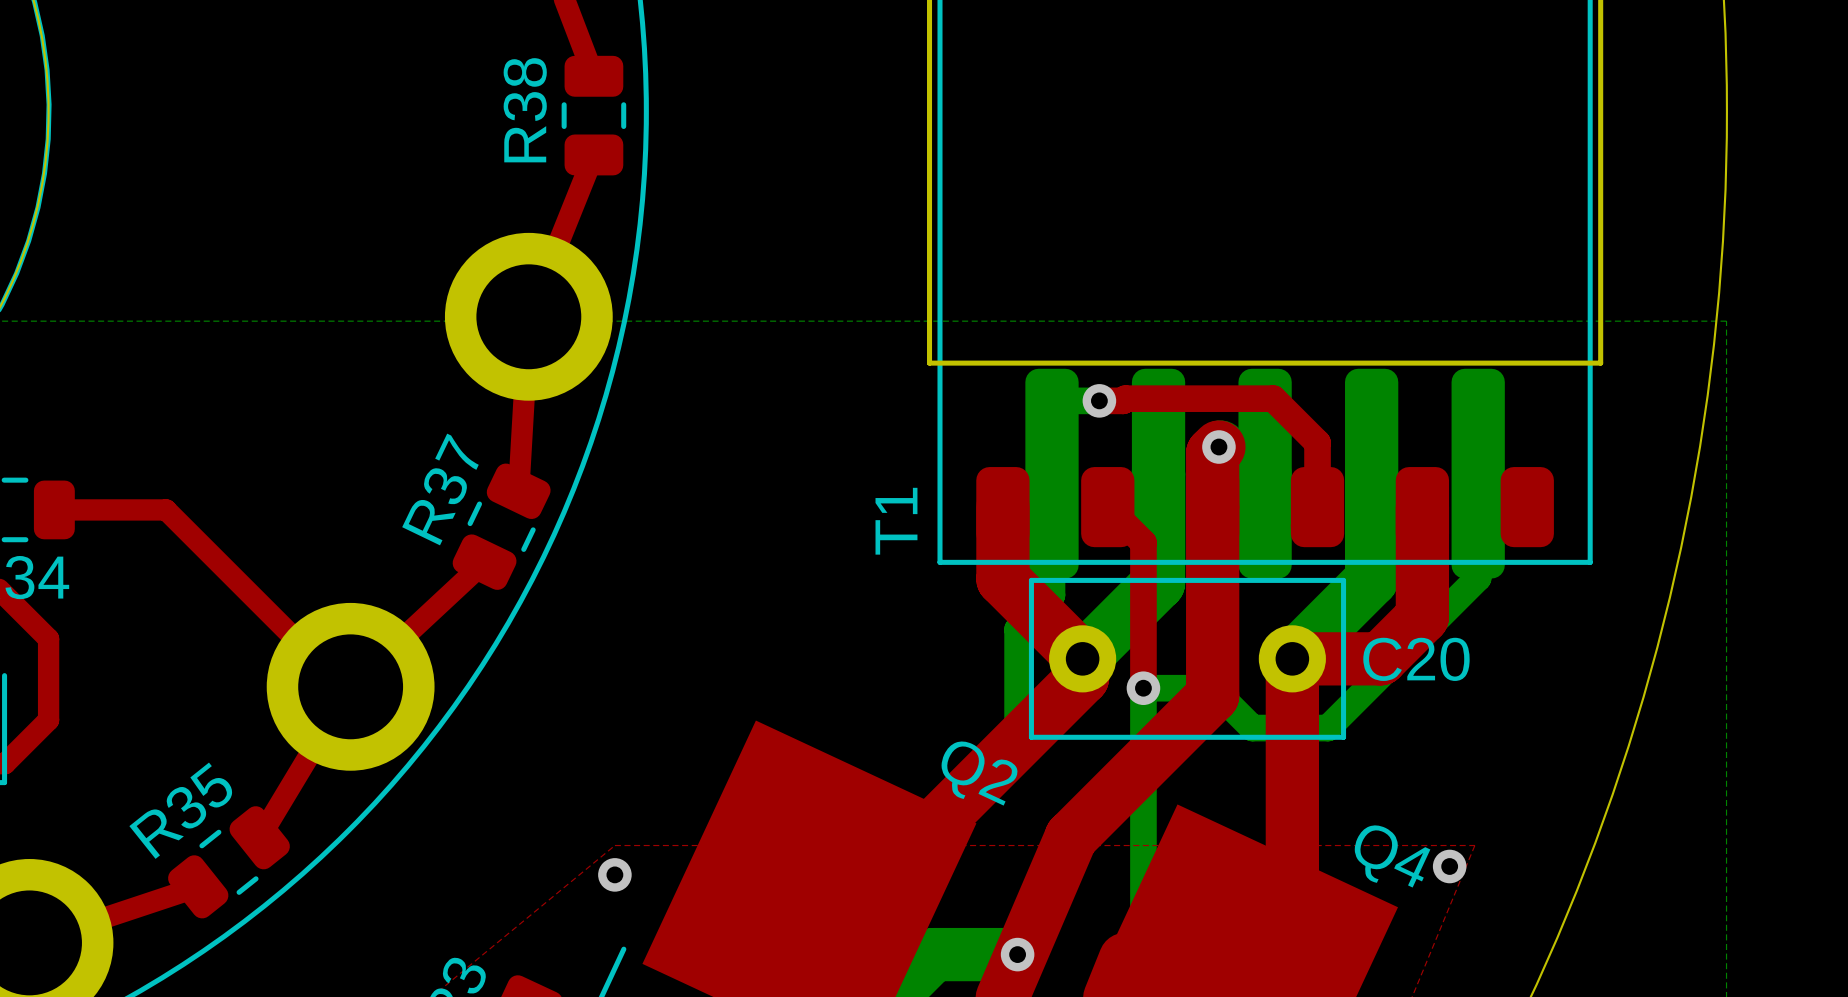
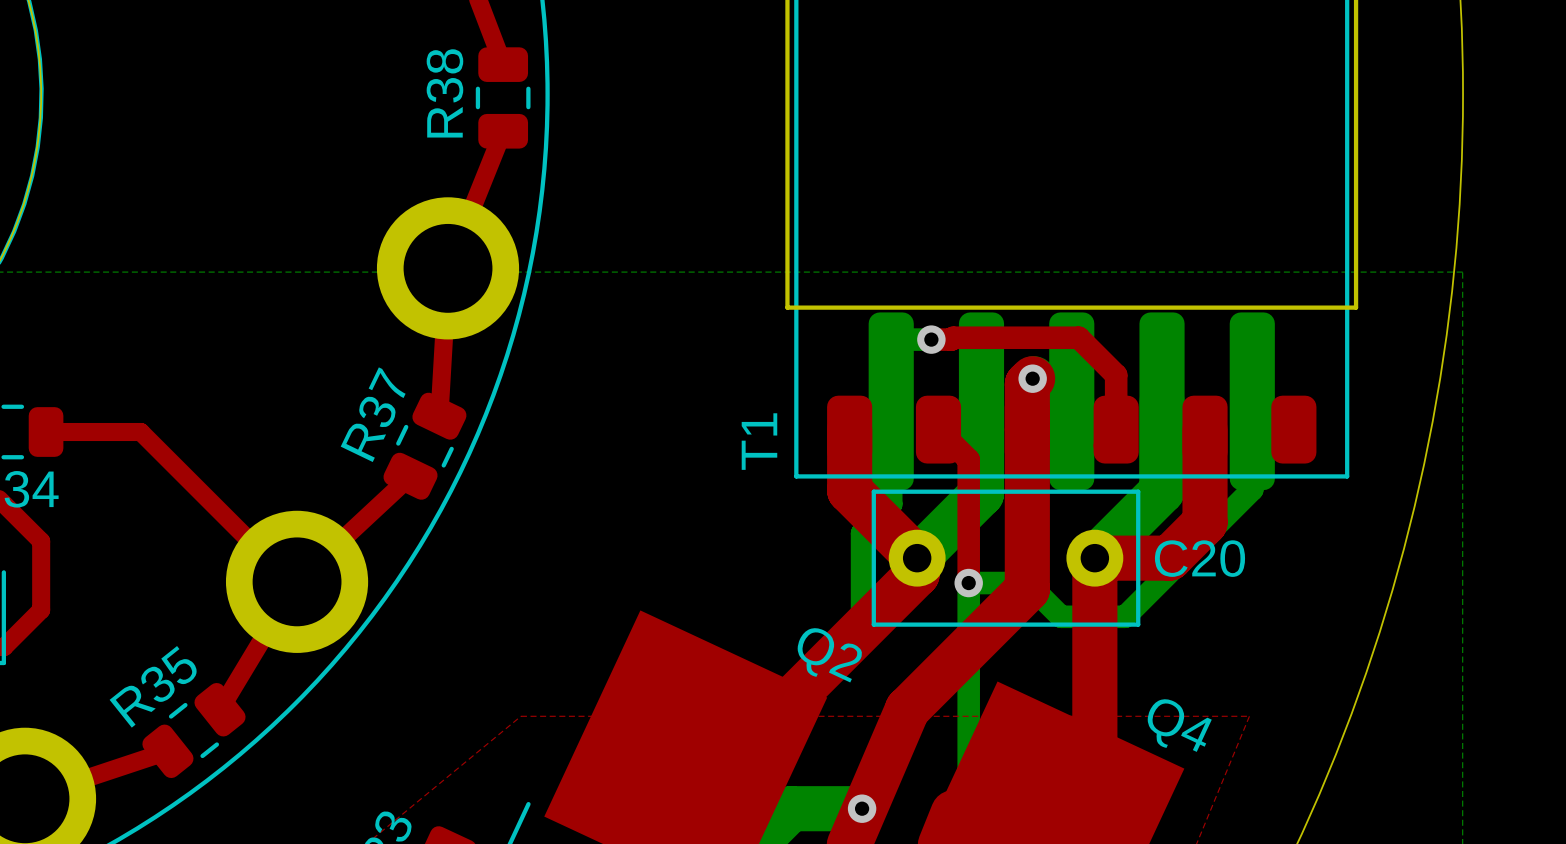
via: (1449, 866) -> none
via: (614, 874) -> none

